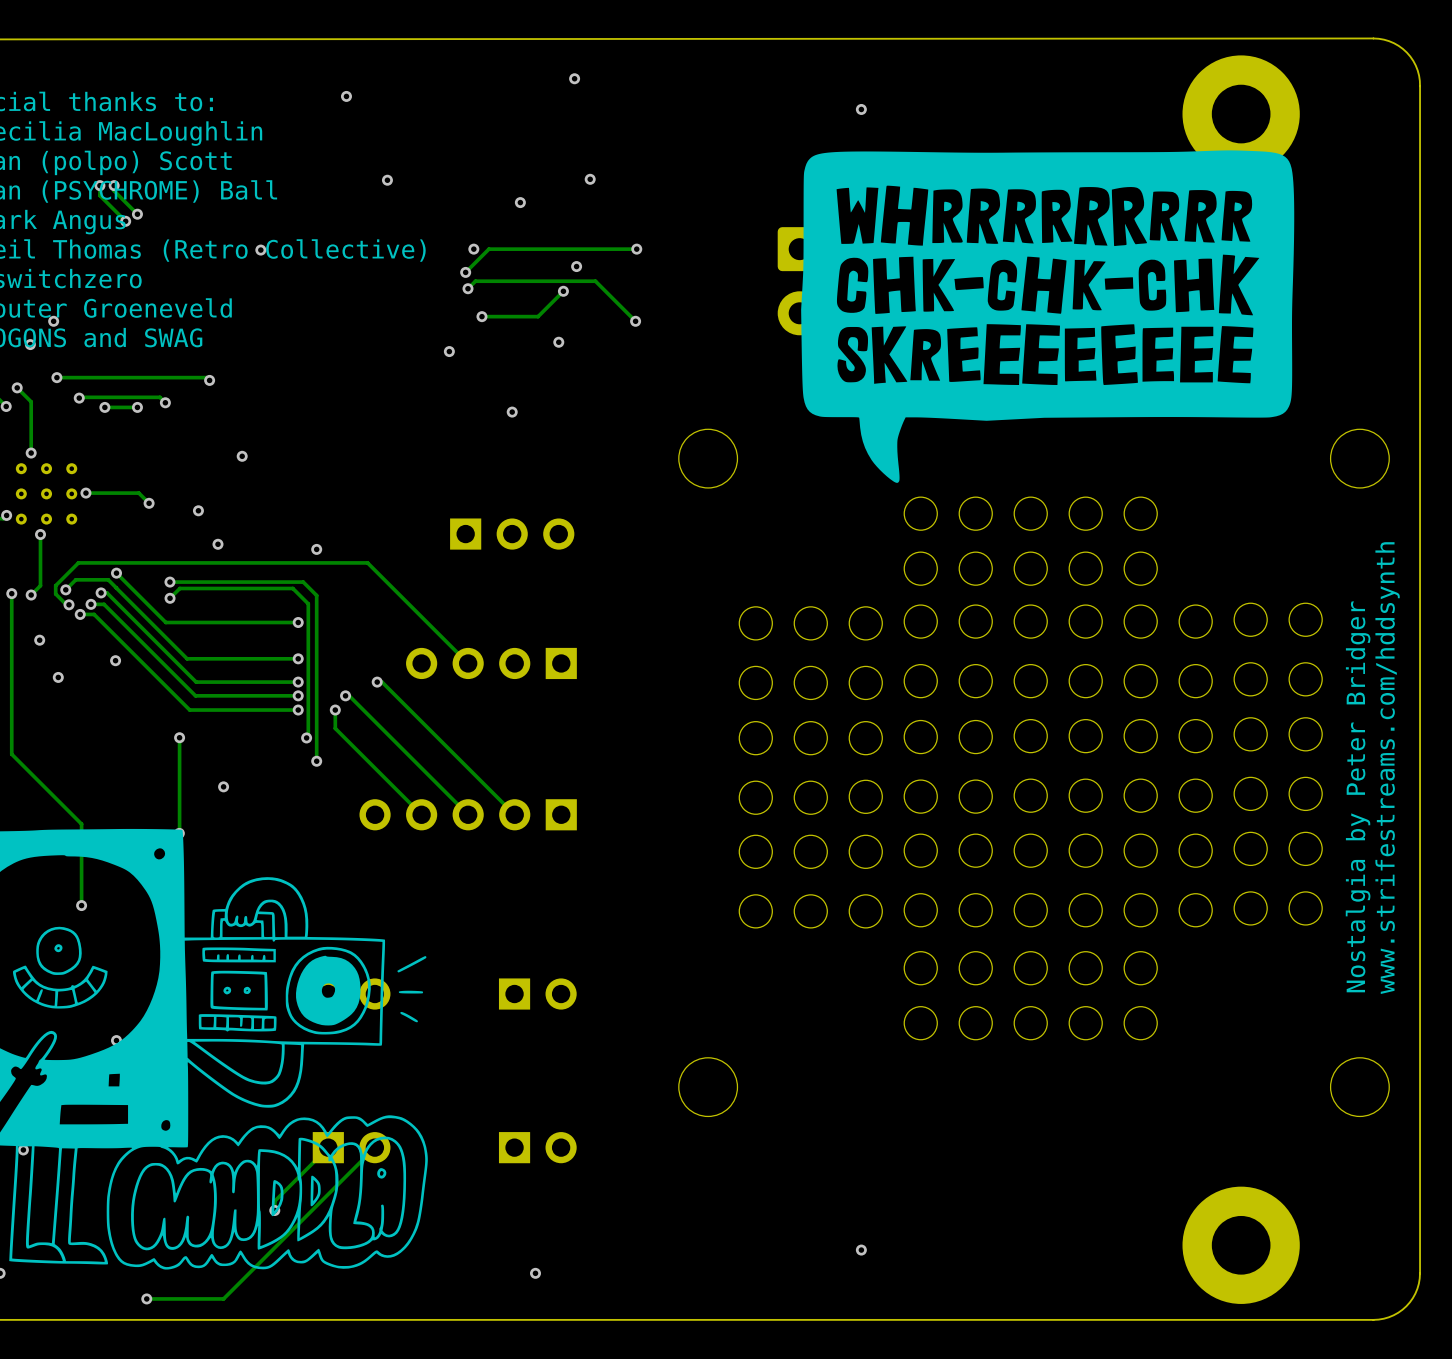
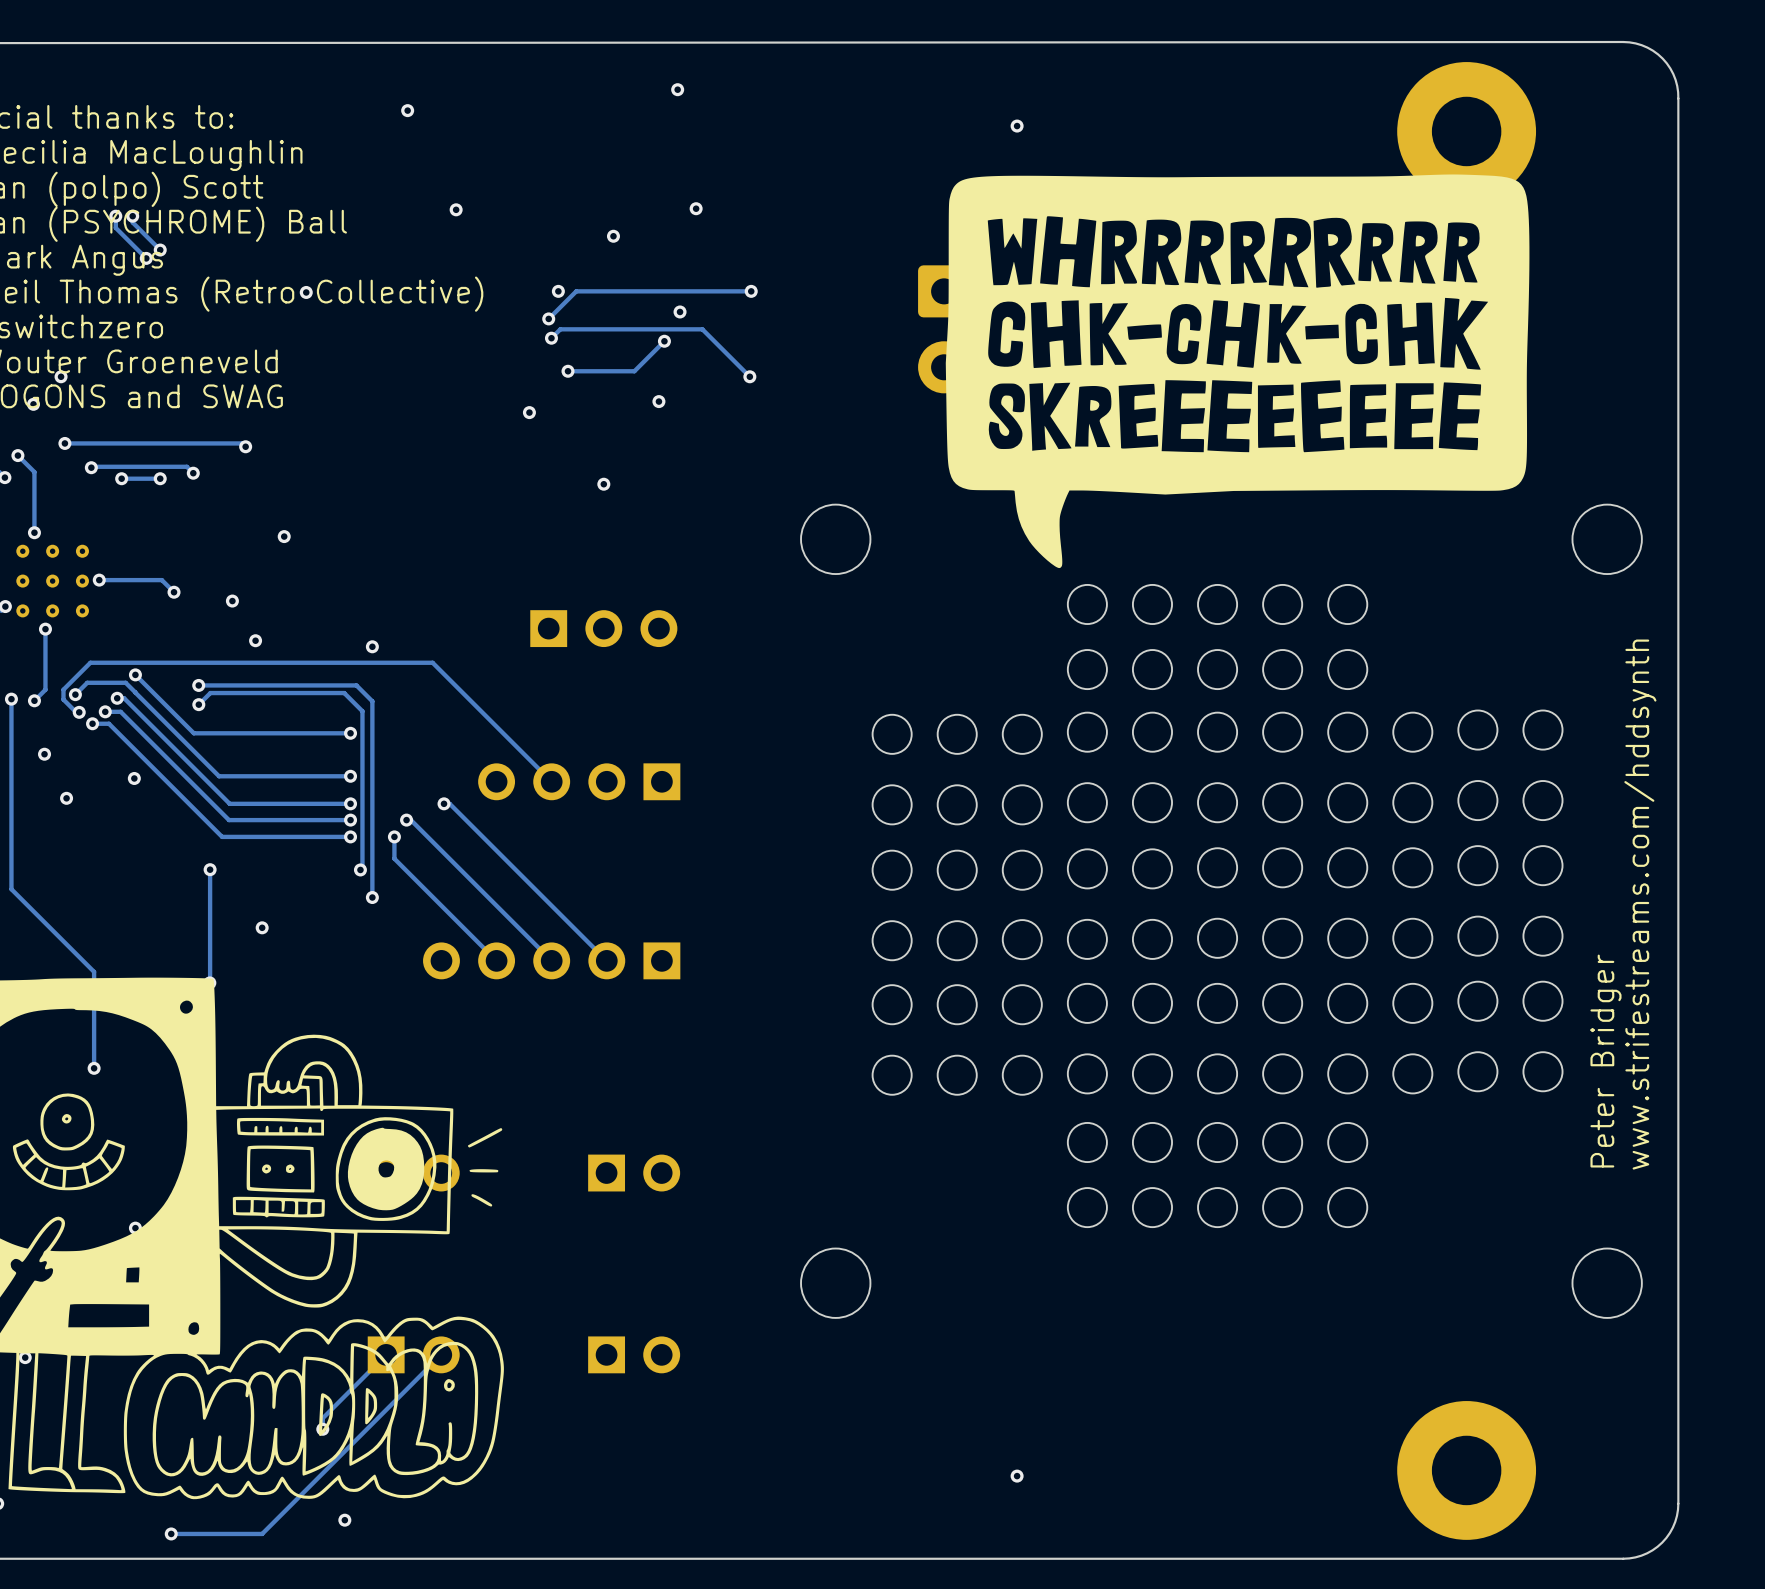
text: Nostalgia by Peter Bridger (1358, 796) -> Peter Bridger (1605, 1061)
via: (535, 1273) -> none
via: none -> (344, 1520)

